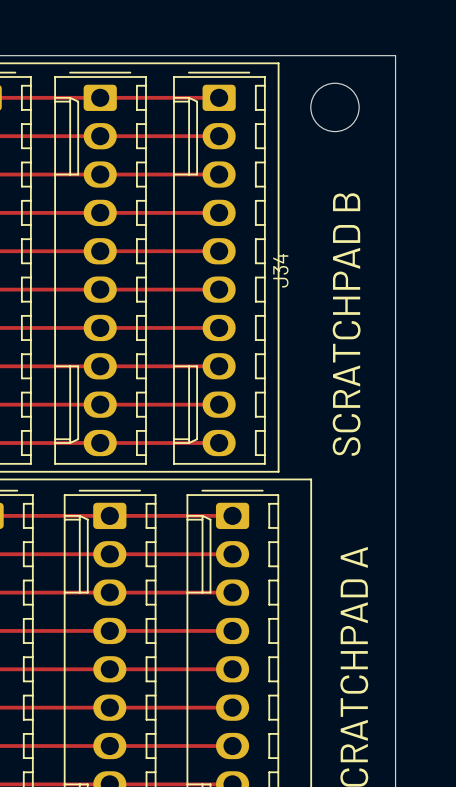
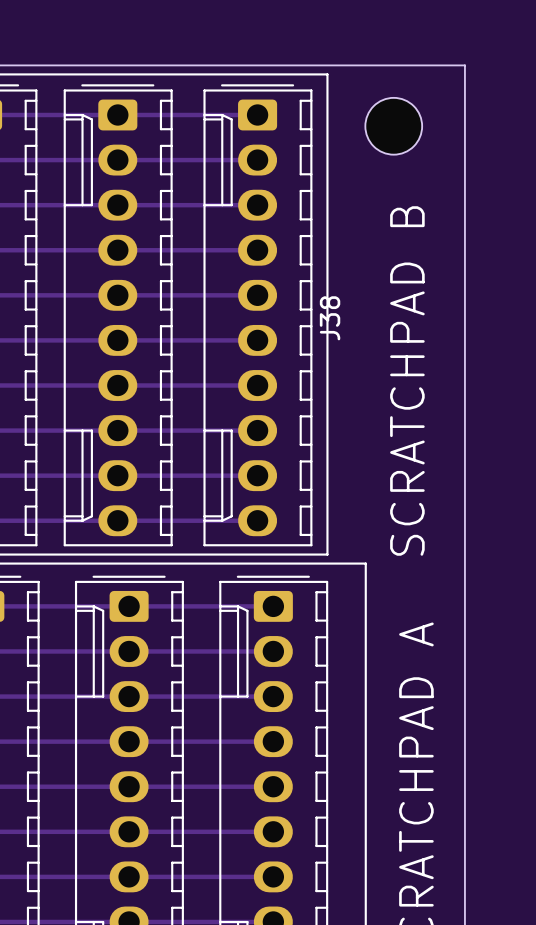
J34 name: J34 (280, 270) -> J38 (330, 318)

